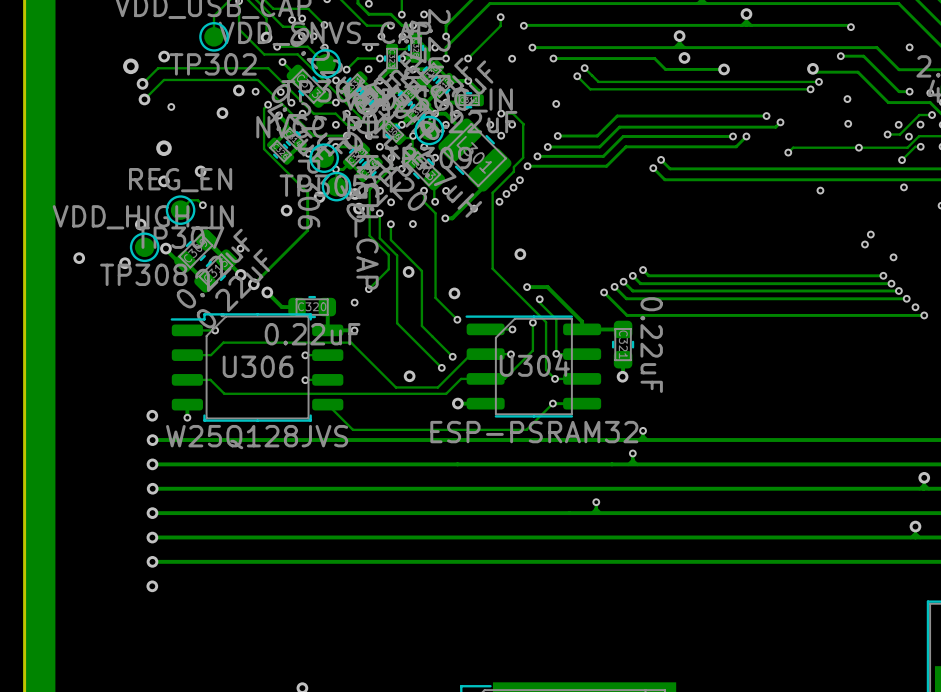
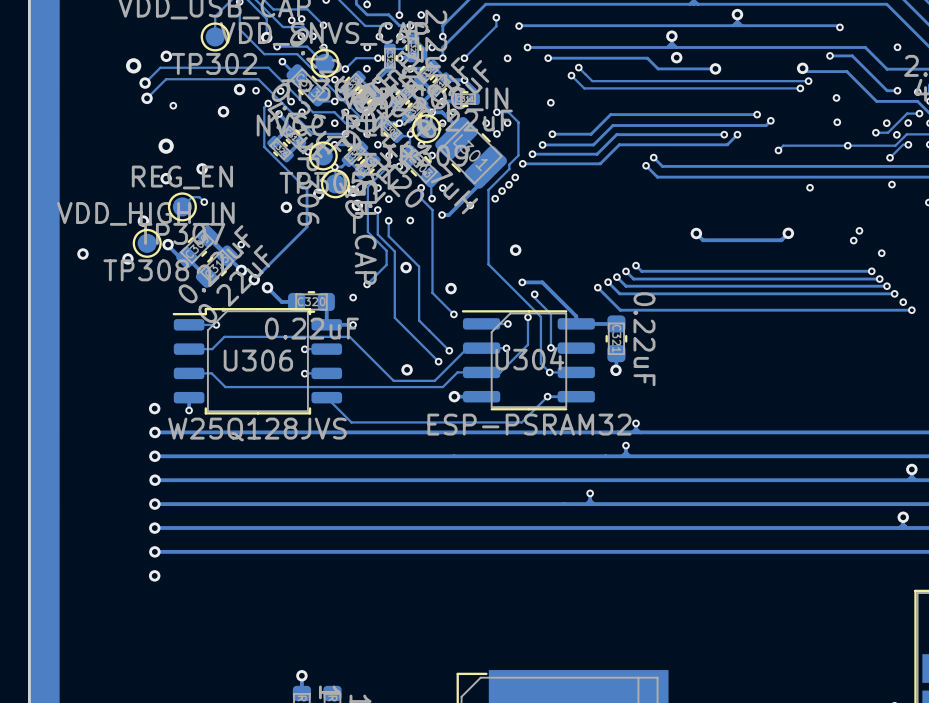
via: none -> (696, 233)
track: none -> (788, 233) (781, 240) (703, 240) (696, 233)
via: none -> (788, 233)

